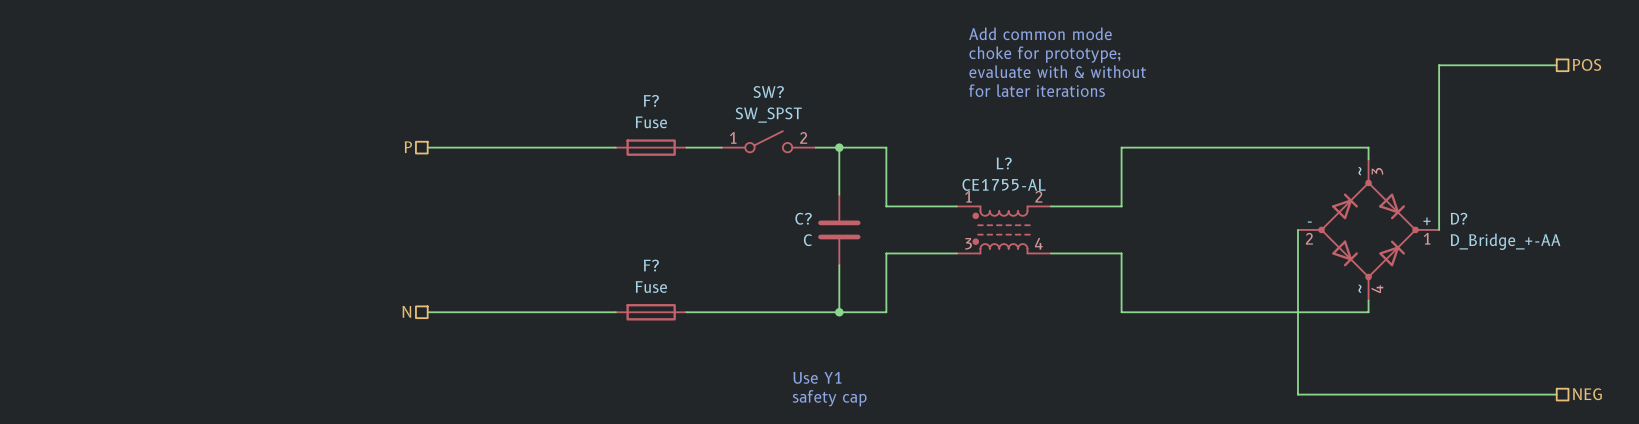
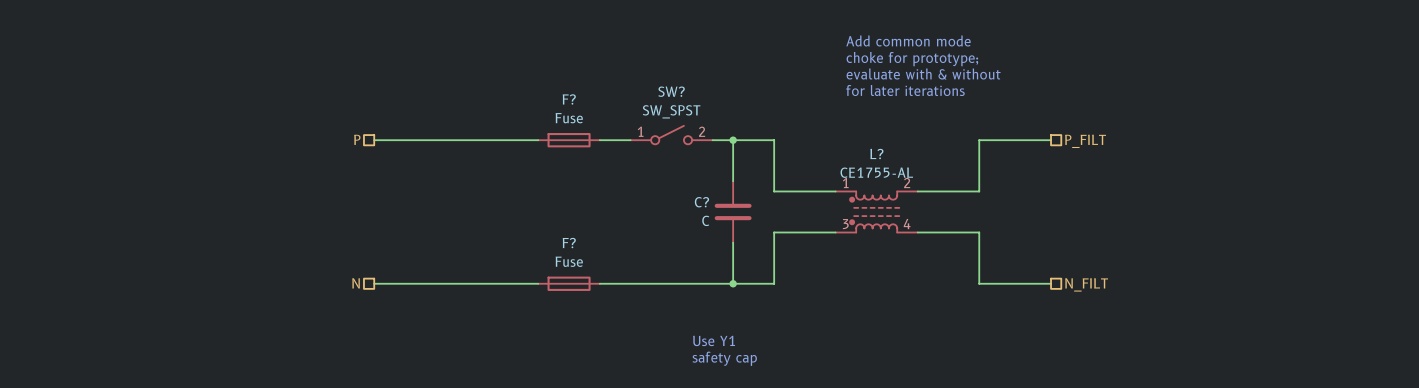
hierarchical label: POS (1586, 64) -> none
wire: (1556, 65) (1439, 65) (1439, 229) -> none
wire: (1203, 147) (1368, 147) (1368, 159) -> none
hierarchical label: none -> P_FILT (1085, 141)
wire: (1297, 229) (1297, 394) (1556, 394) -> none
D?: D_Bridge_+-AA (1368, 229) -> none
wire: (1368, 300) (1368, 312) (1203, 312) -> none
hierarchical label: none -> N_FILT (1086, 284)
hierarchical label: NEG (1587, 394) -> none

